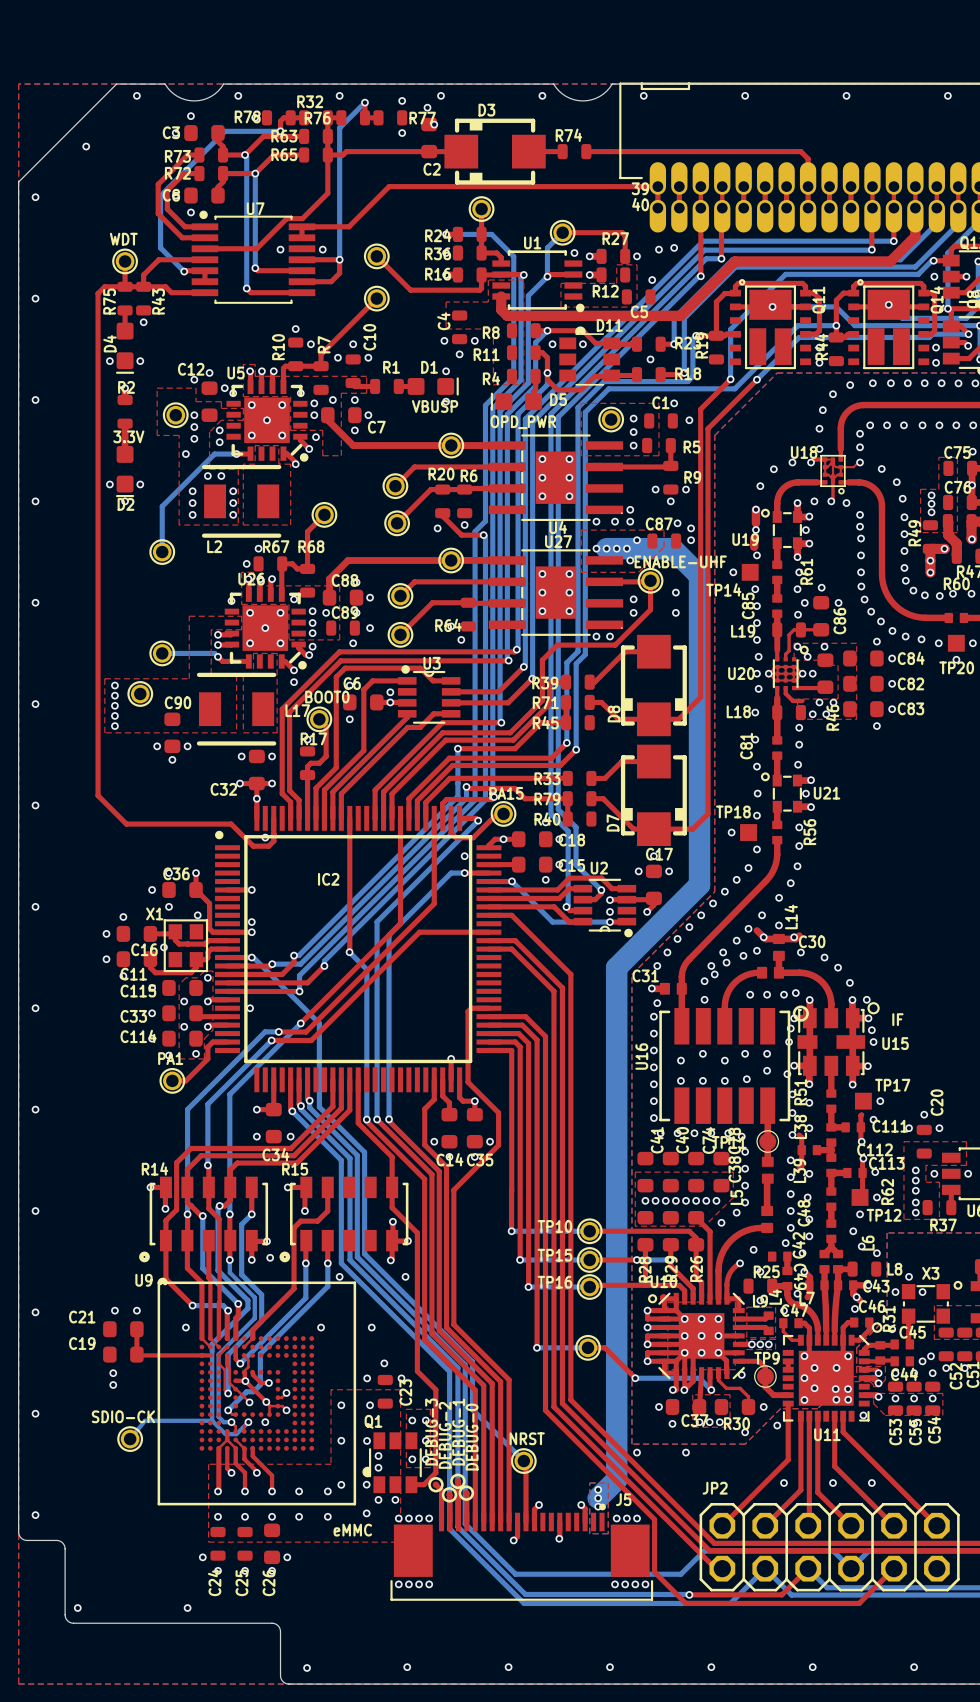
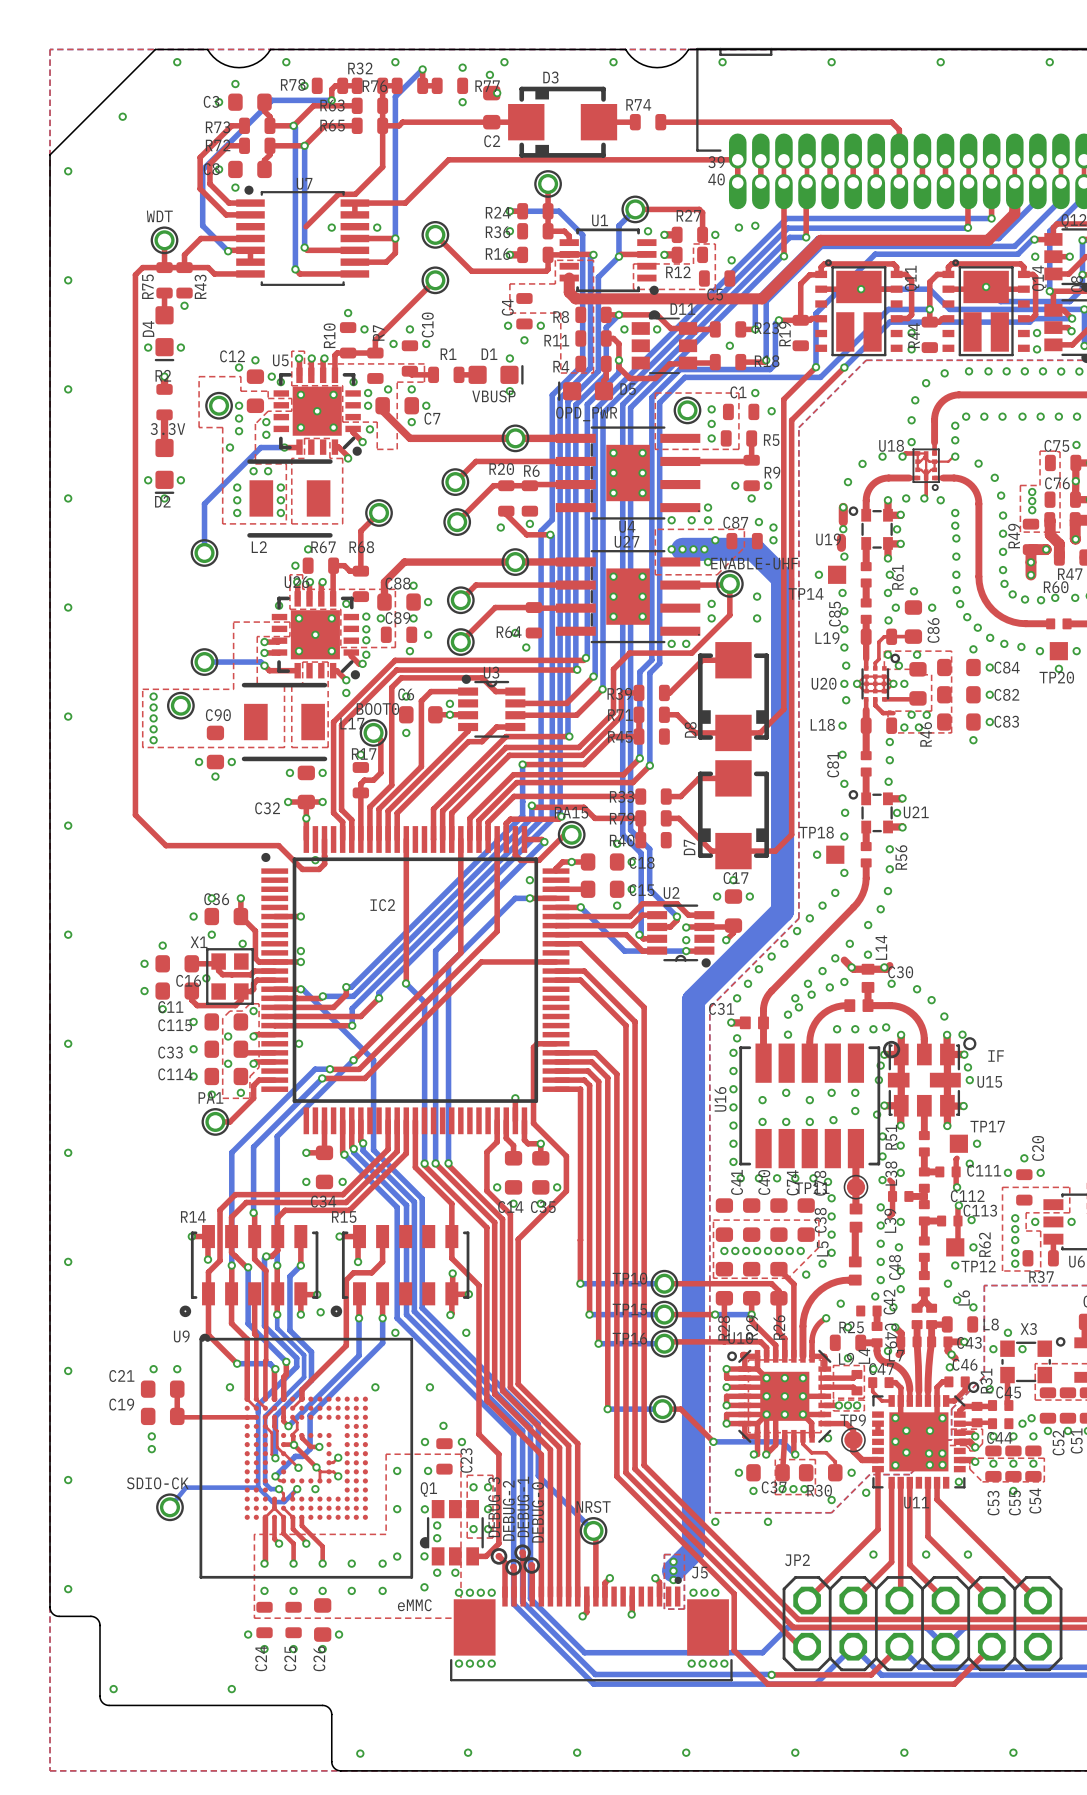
top track: (204, 248) (256, 248) -> none

